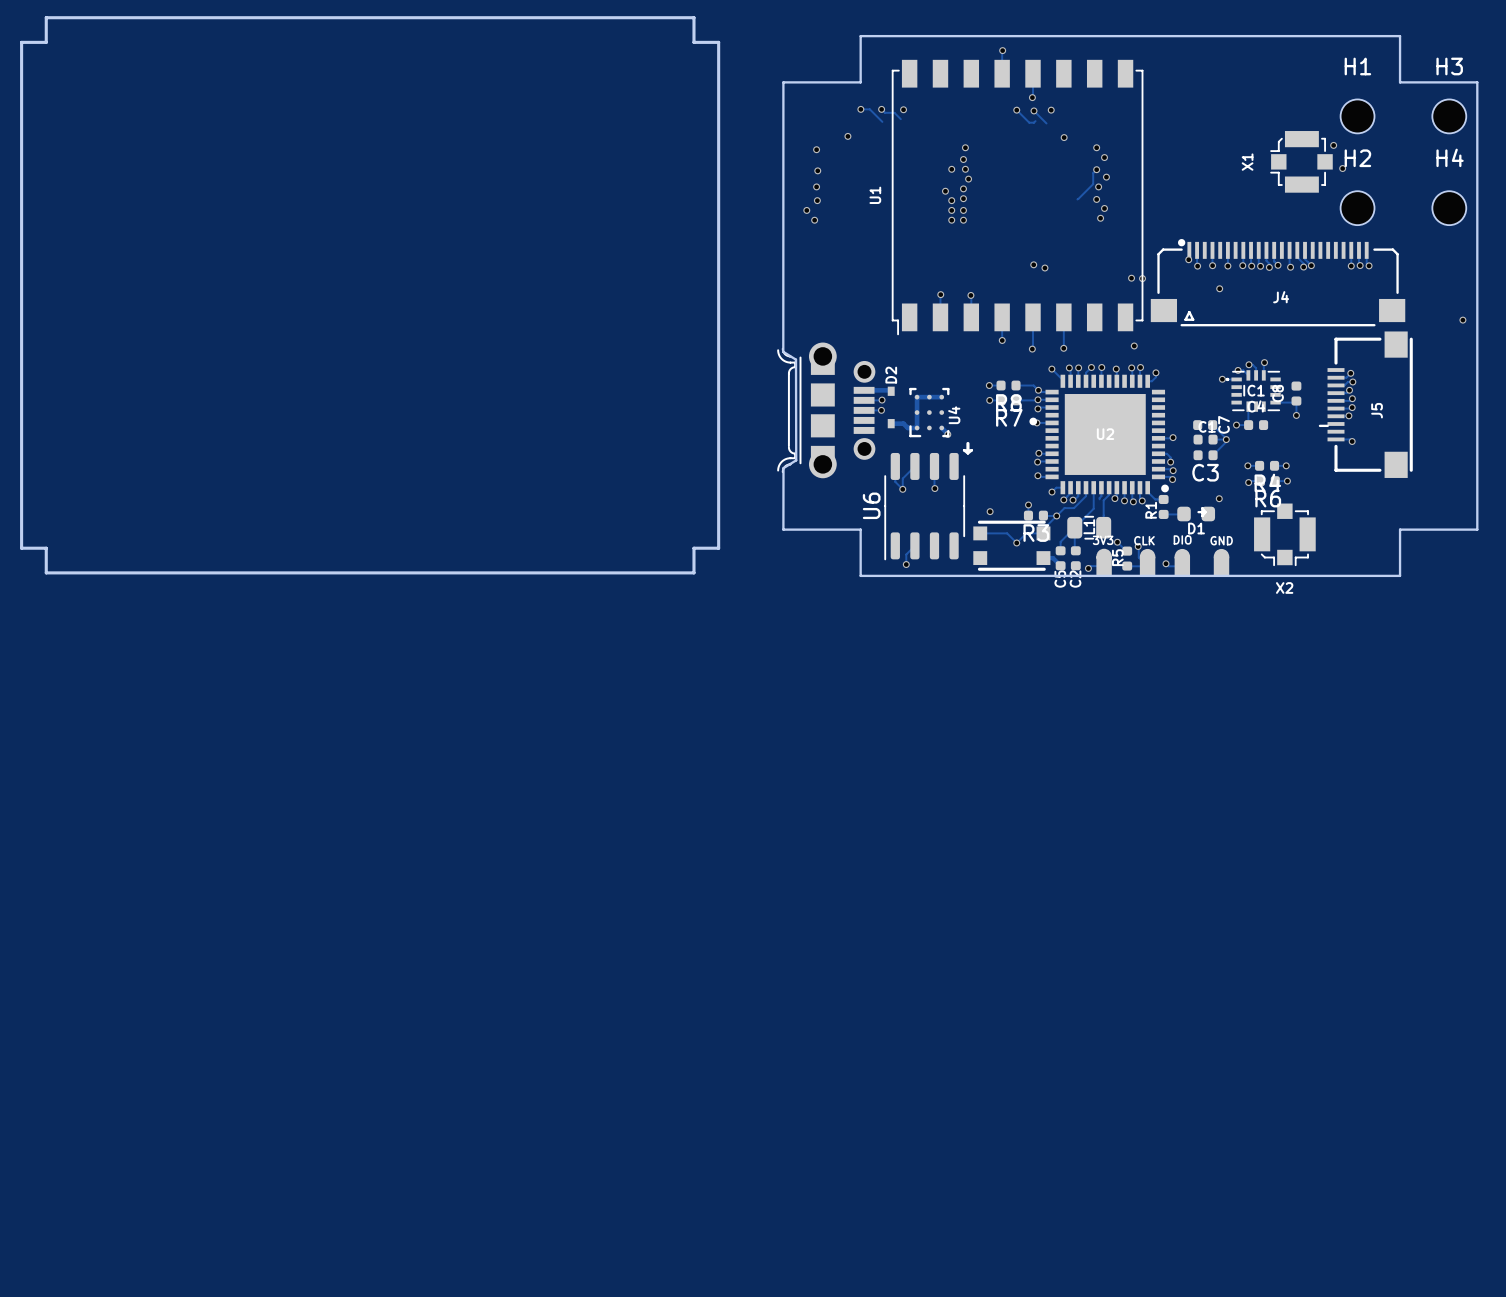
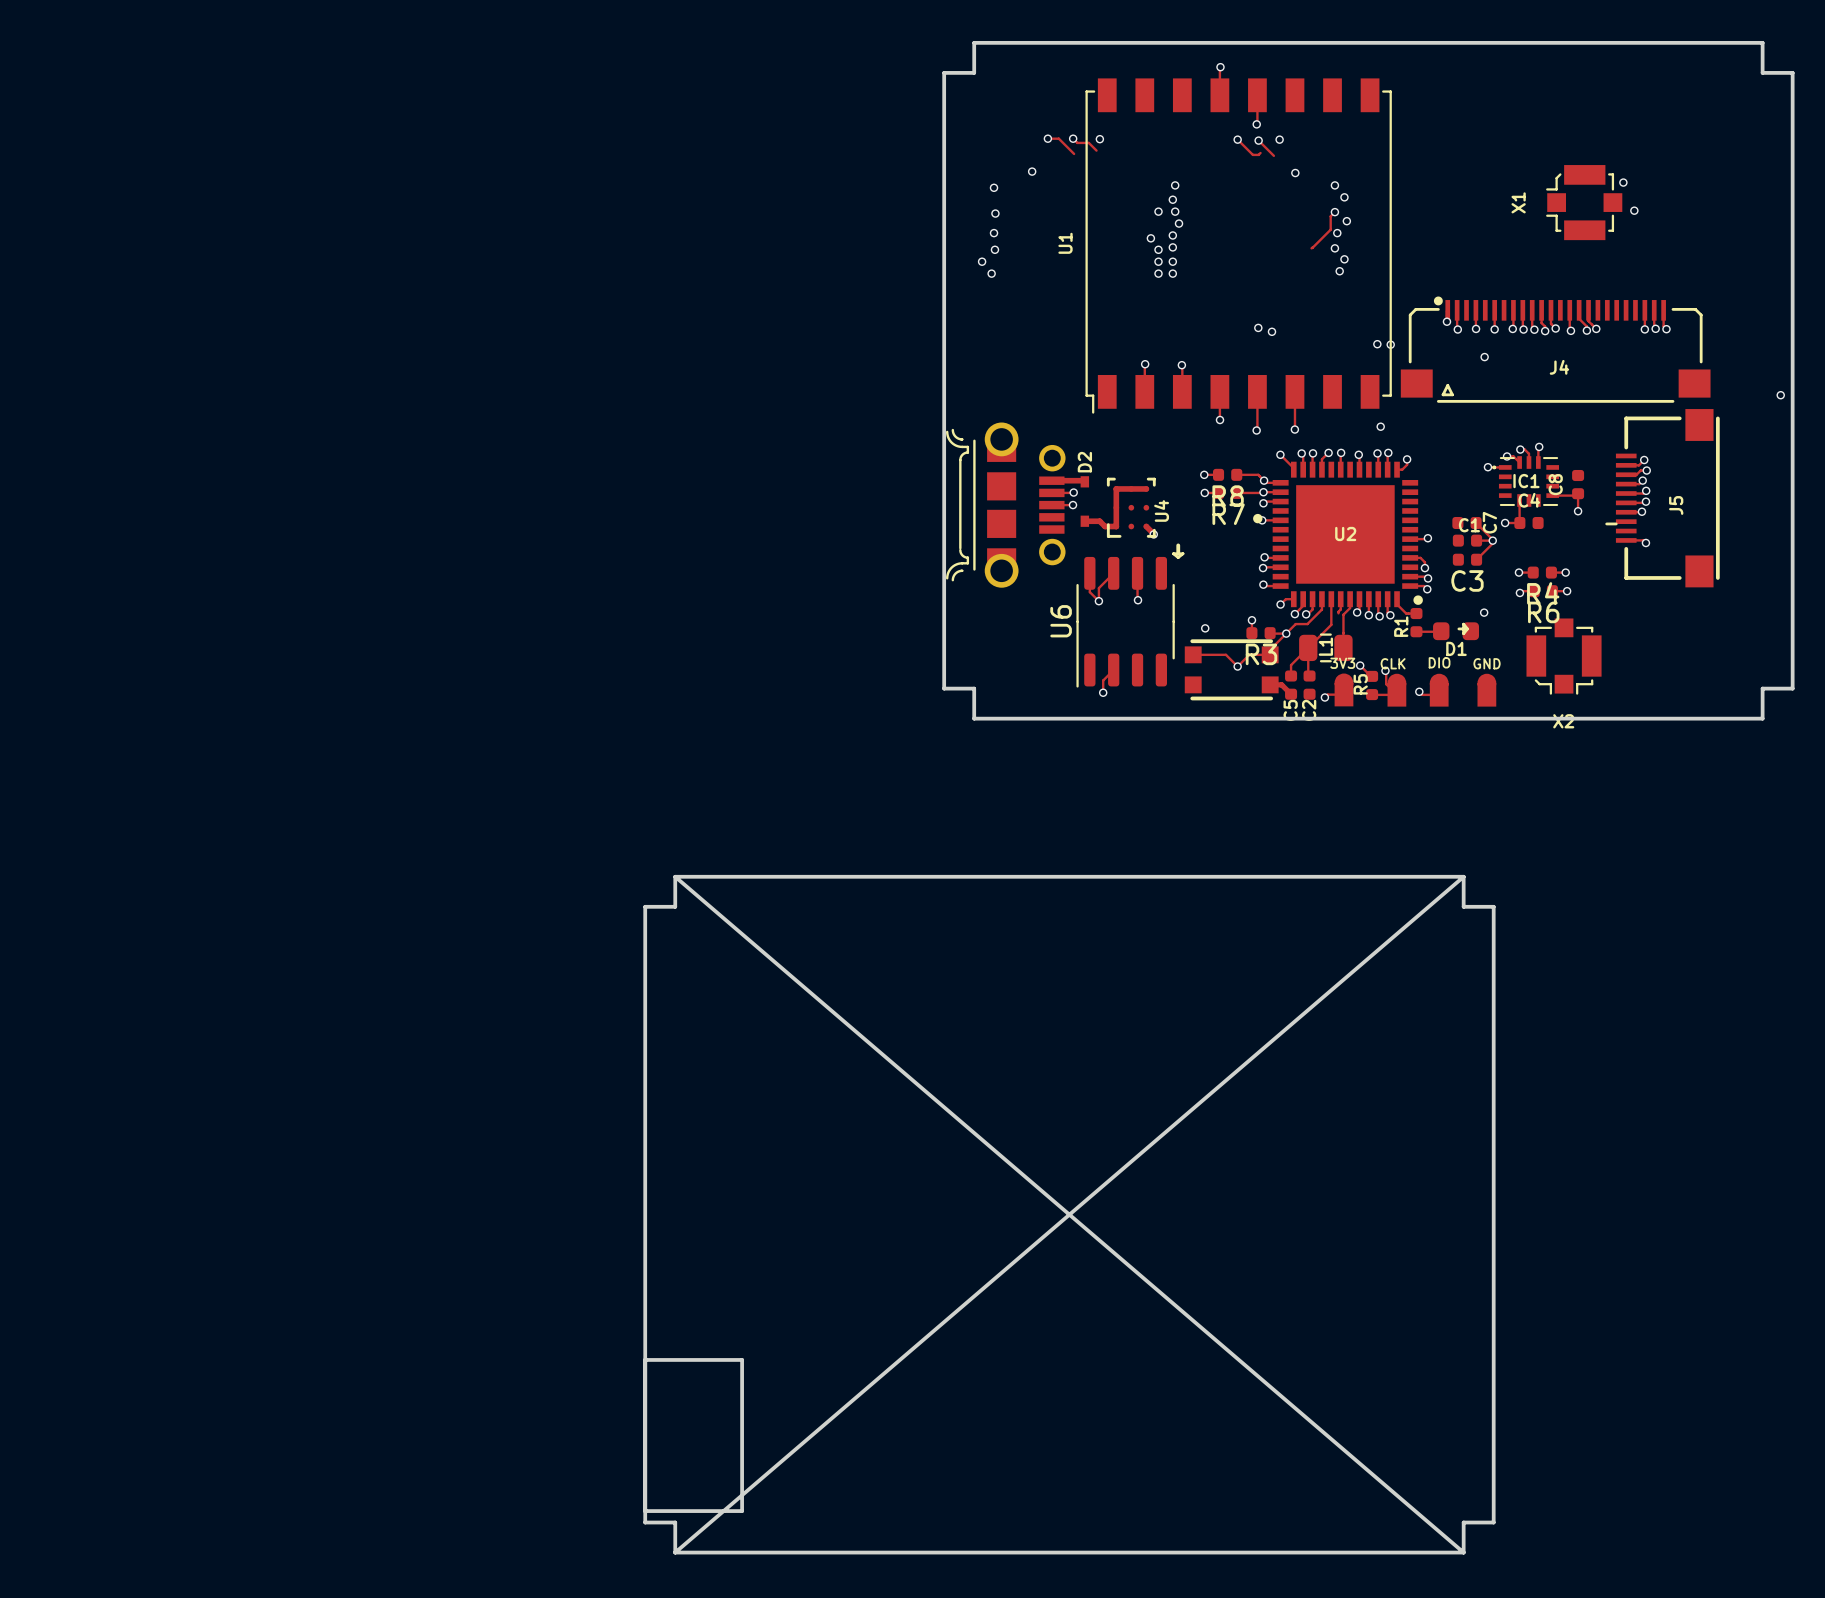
board edge: (46, 17) (46, 42) (21, 42) (21, 548) (46, 548) (46, 572) (693, 572) (693, 548) (718, 548) (718, 42) (693, 42) (693, 17) (46, 17) -> none
board edge: (860, 36) (860, 82) (783, 82) (783, 351) (796, 359) (796, 460) (783, 468) (783, 529) (860, 529) (860, 575) (1400, 575) (1400, 529) (1477, 529) (1477, 82) (1400, 82) (1400, 36) (860, 36) -> (974, 42) (974, 72) (944, 72) (944, 688) (974, 688) (974, 718) (1762, 718) (1762, 688) (1792, 688) (1792, 72) (1762, 72) (1762, 42) (974, 42)
H1: (1357, 116) -> none
H3: (1449, 116) -> none
H2: (1357, 208) -> none
H4: (1449, 208) -> none
board edge: none -> (675, 876) (1463, 1552)
board edge: none -> (675, 876) (675, 906) (645, 906) (645, 1522) (675, 1522) (675, 1552)
board edge: none -> (675, 876) (1463, 876)
board edge: none -> (1463, 876) (675, 1552)
board edge: none -> (1463, 876) (1463, 906) (1493, 906) (1493, 1522) (1463, 1522) (1463, 1552)
board edge: none -> (645, 1359) (742, 1359) (742, 1511) (645, 1511)
board edge: none -> (675, 1552) (1463, 1552)

